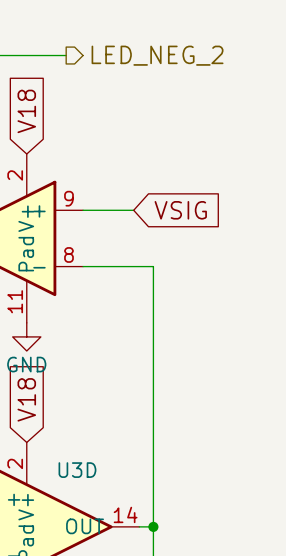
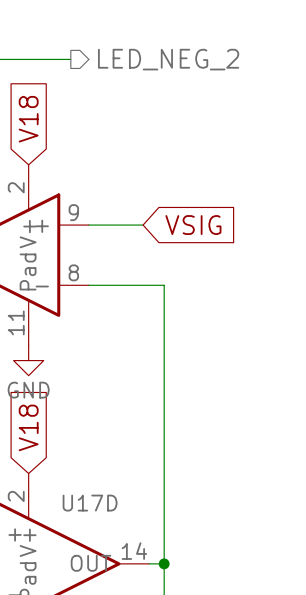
U3D name: U3D (77, 470) -> U17D (90, 503)

